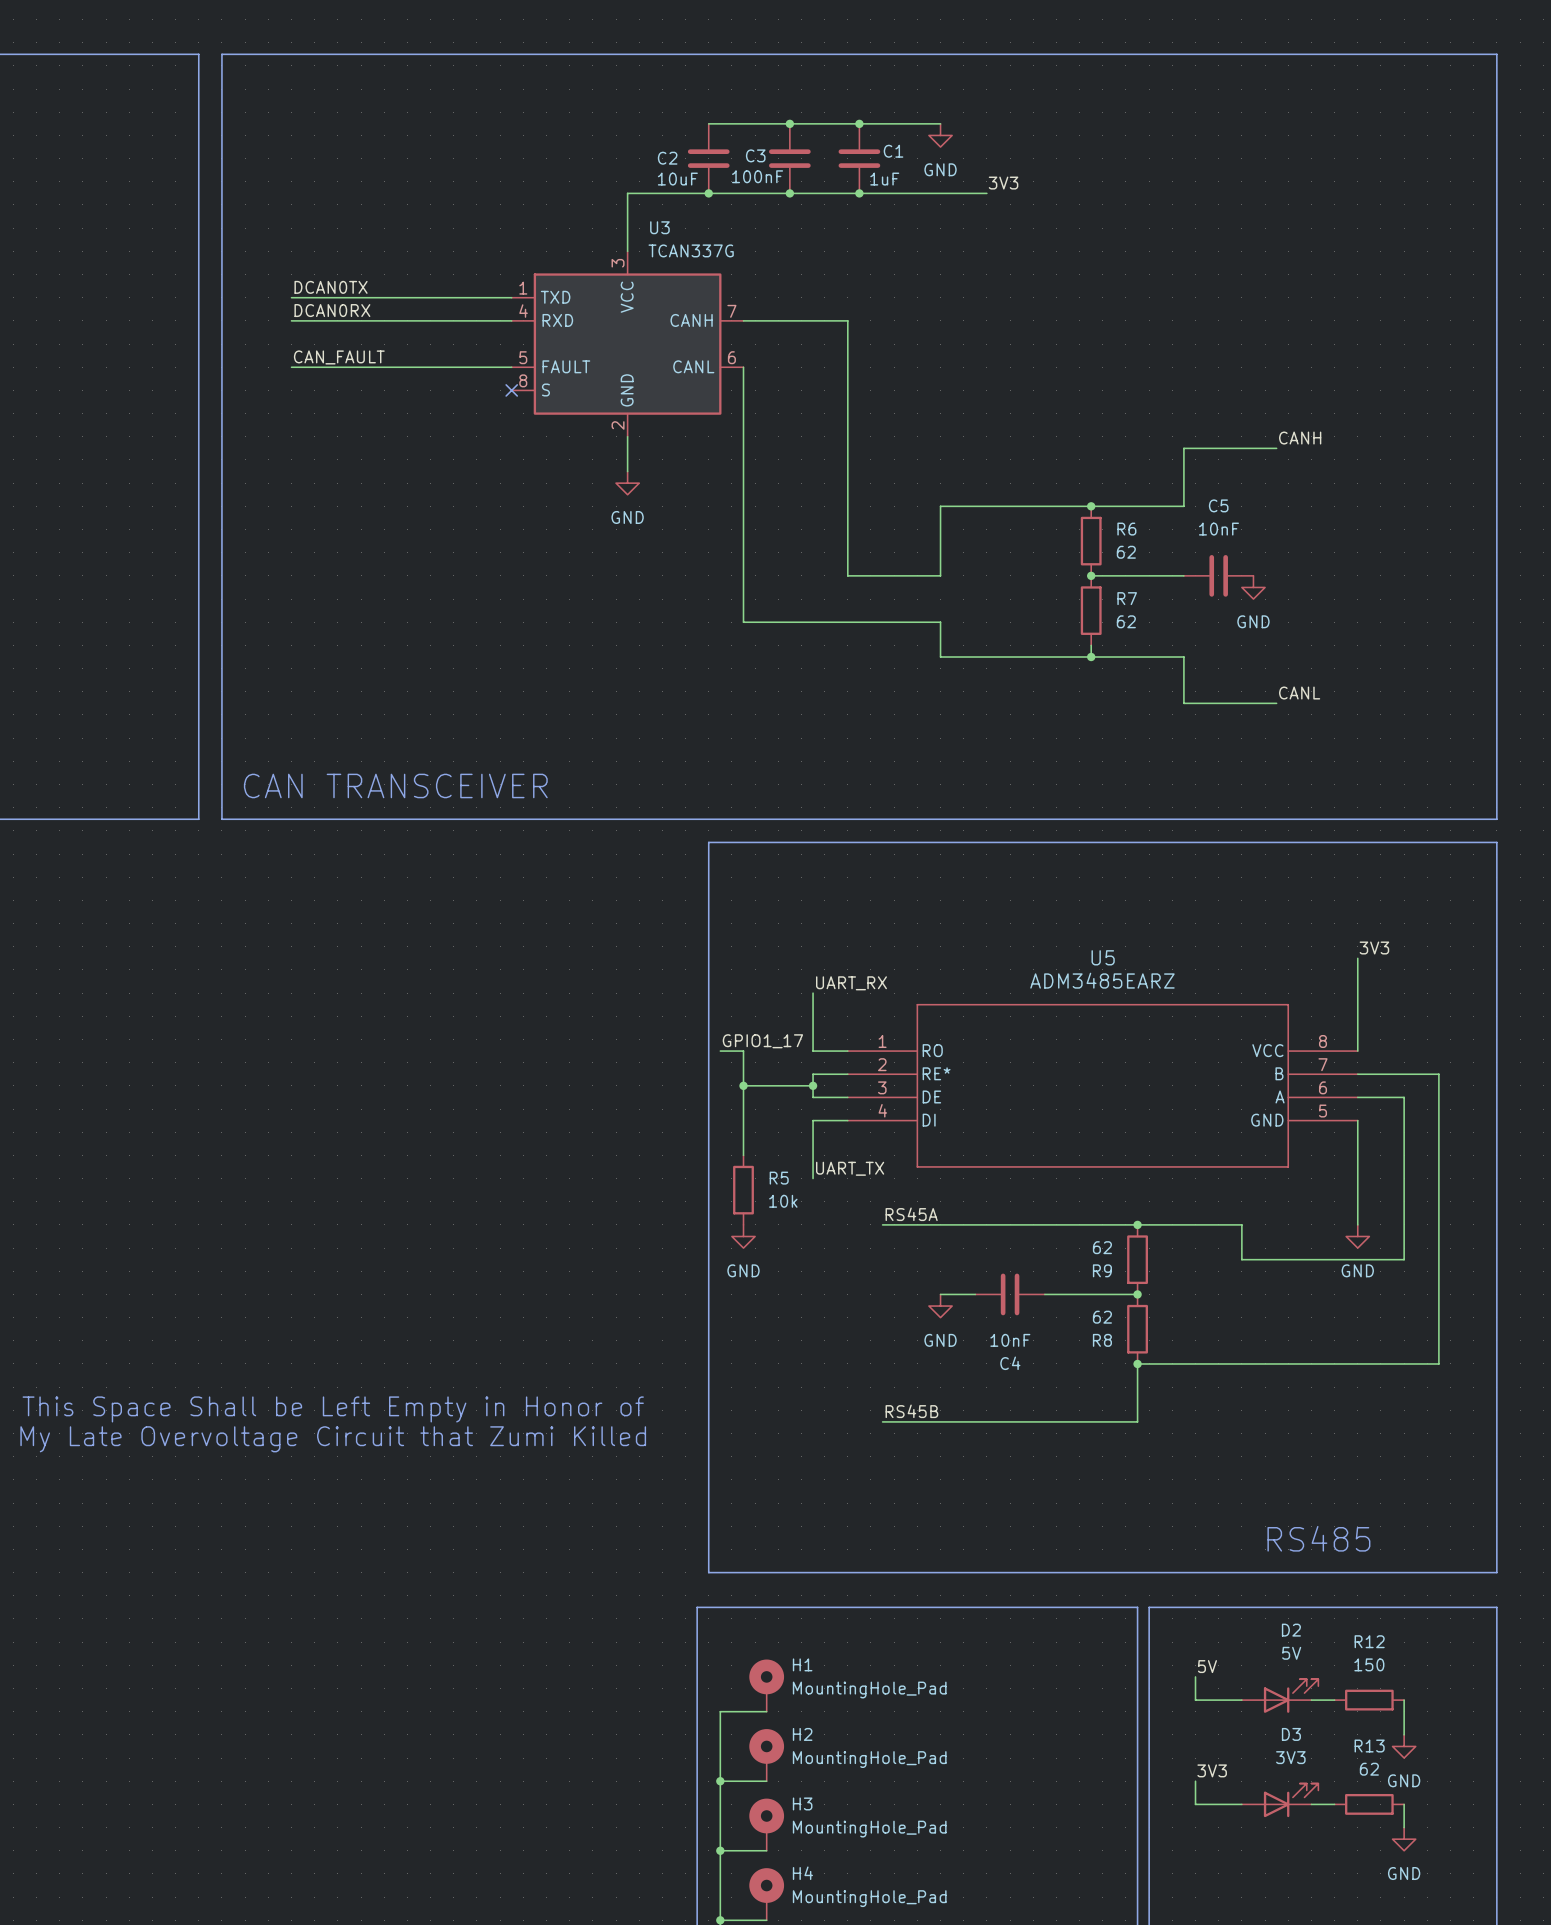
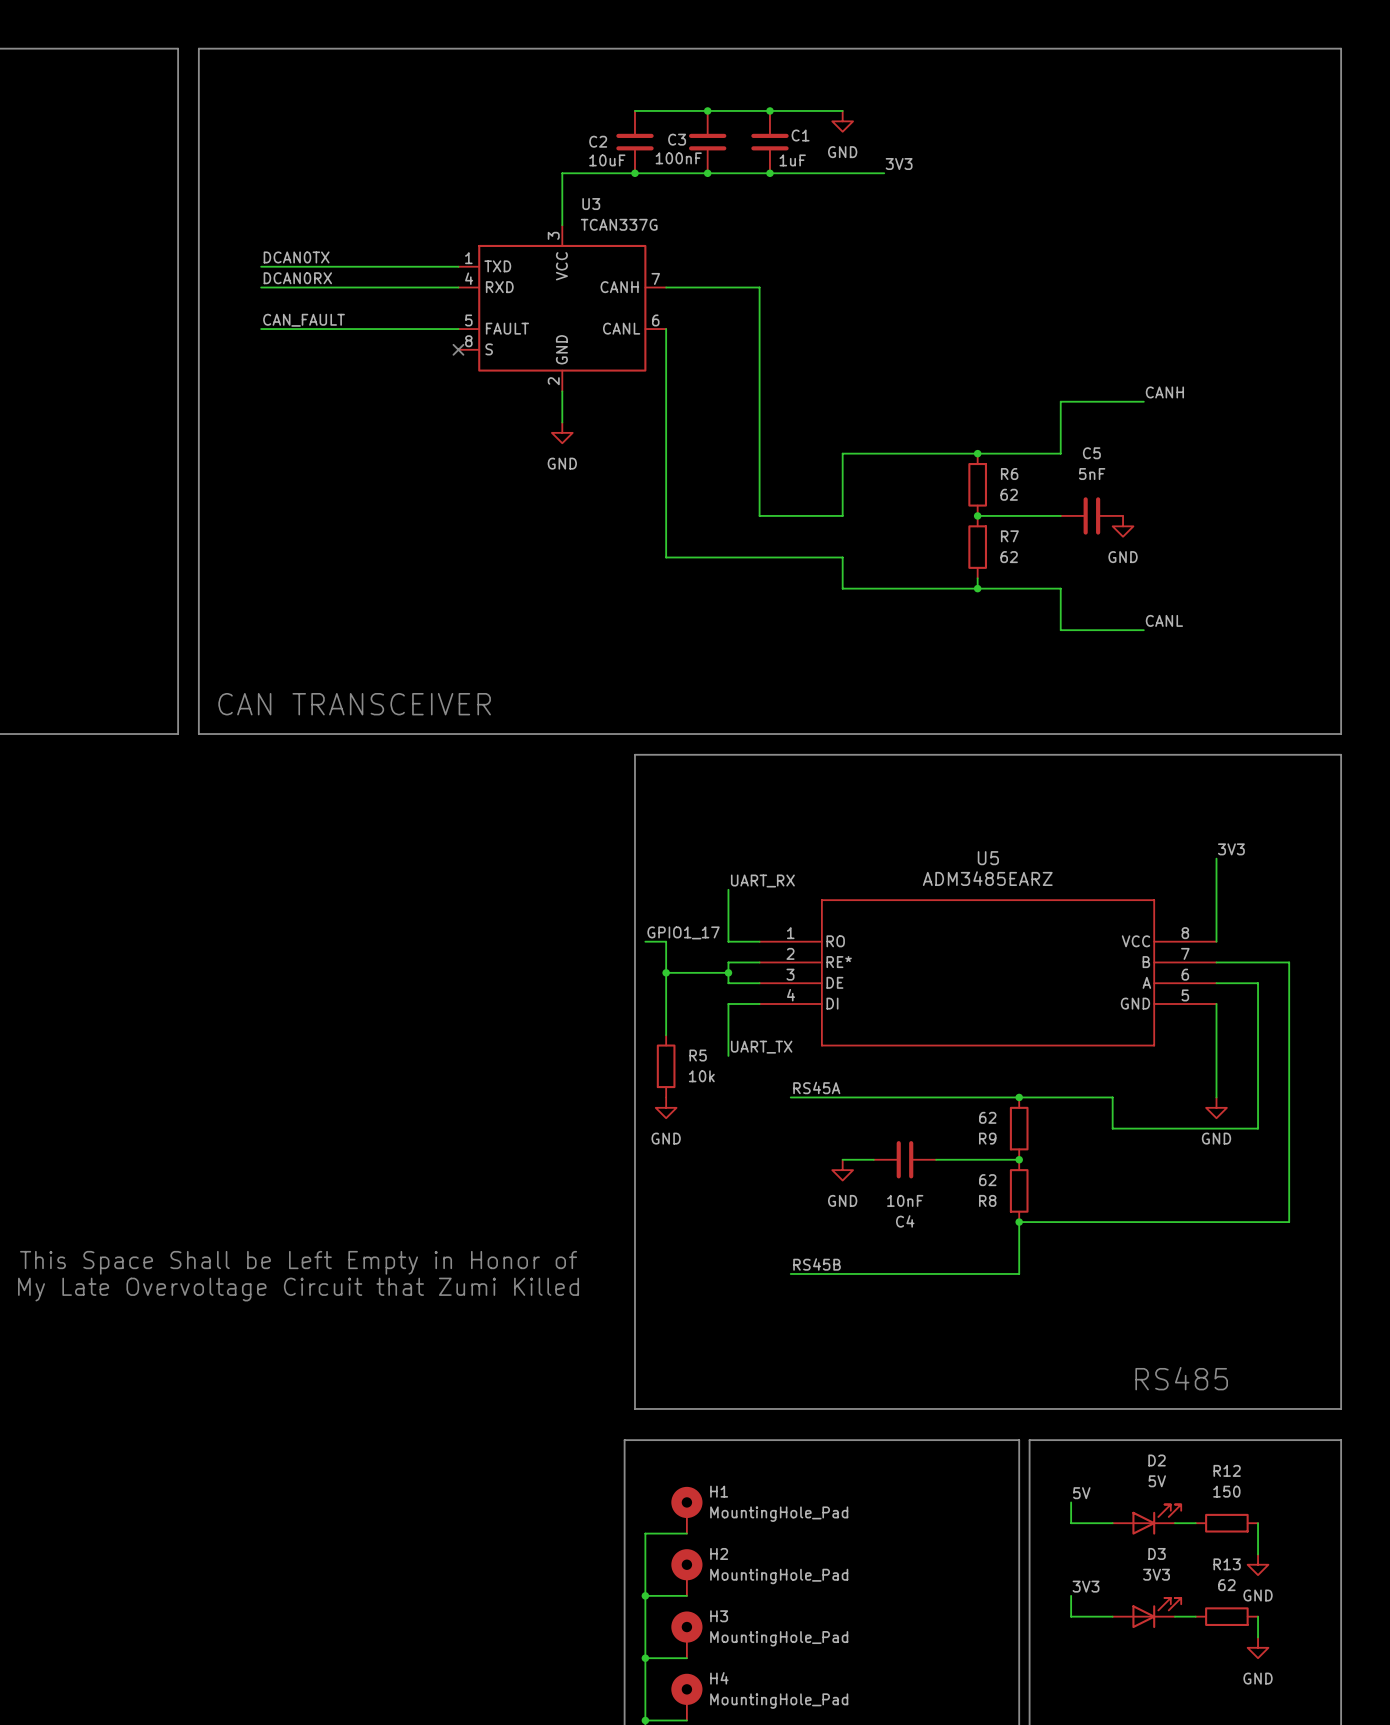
C5 value: 10nF (1218, 529) -> 5nF (1092, 474)

